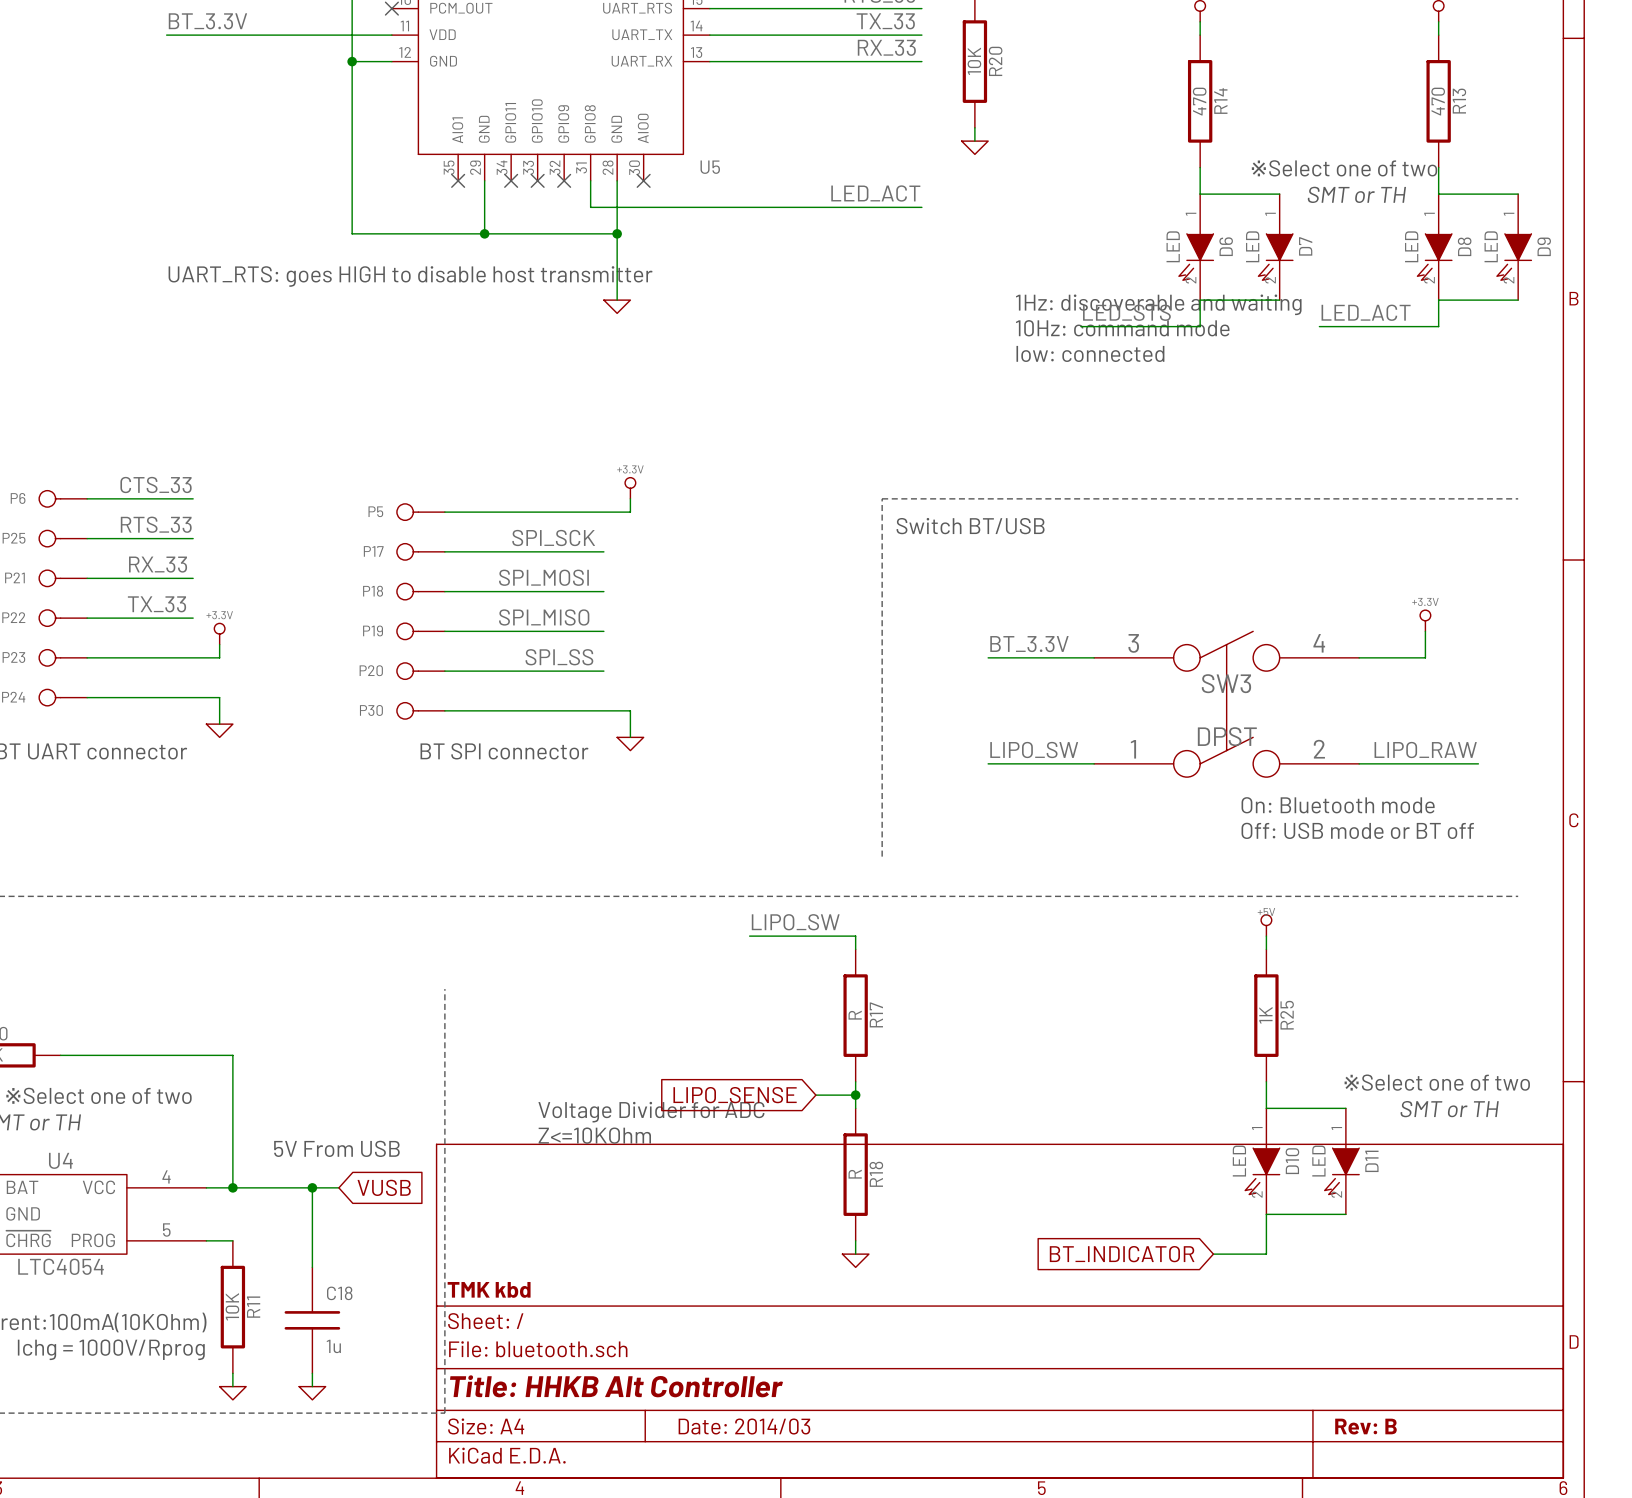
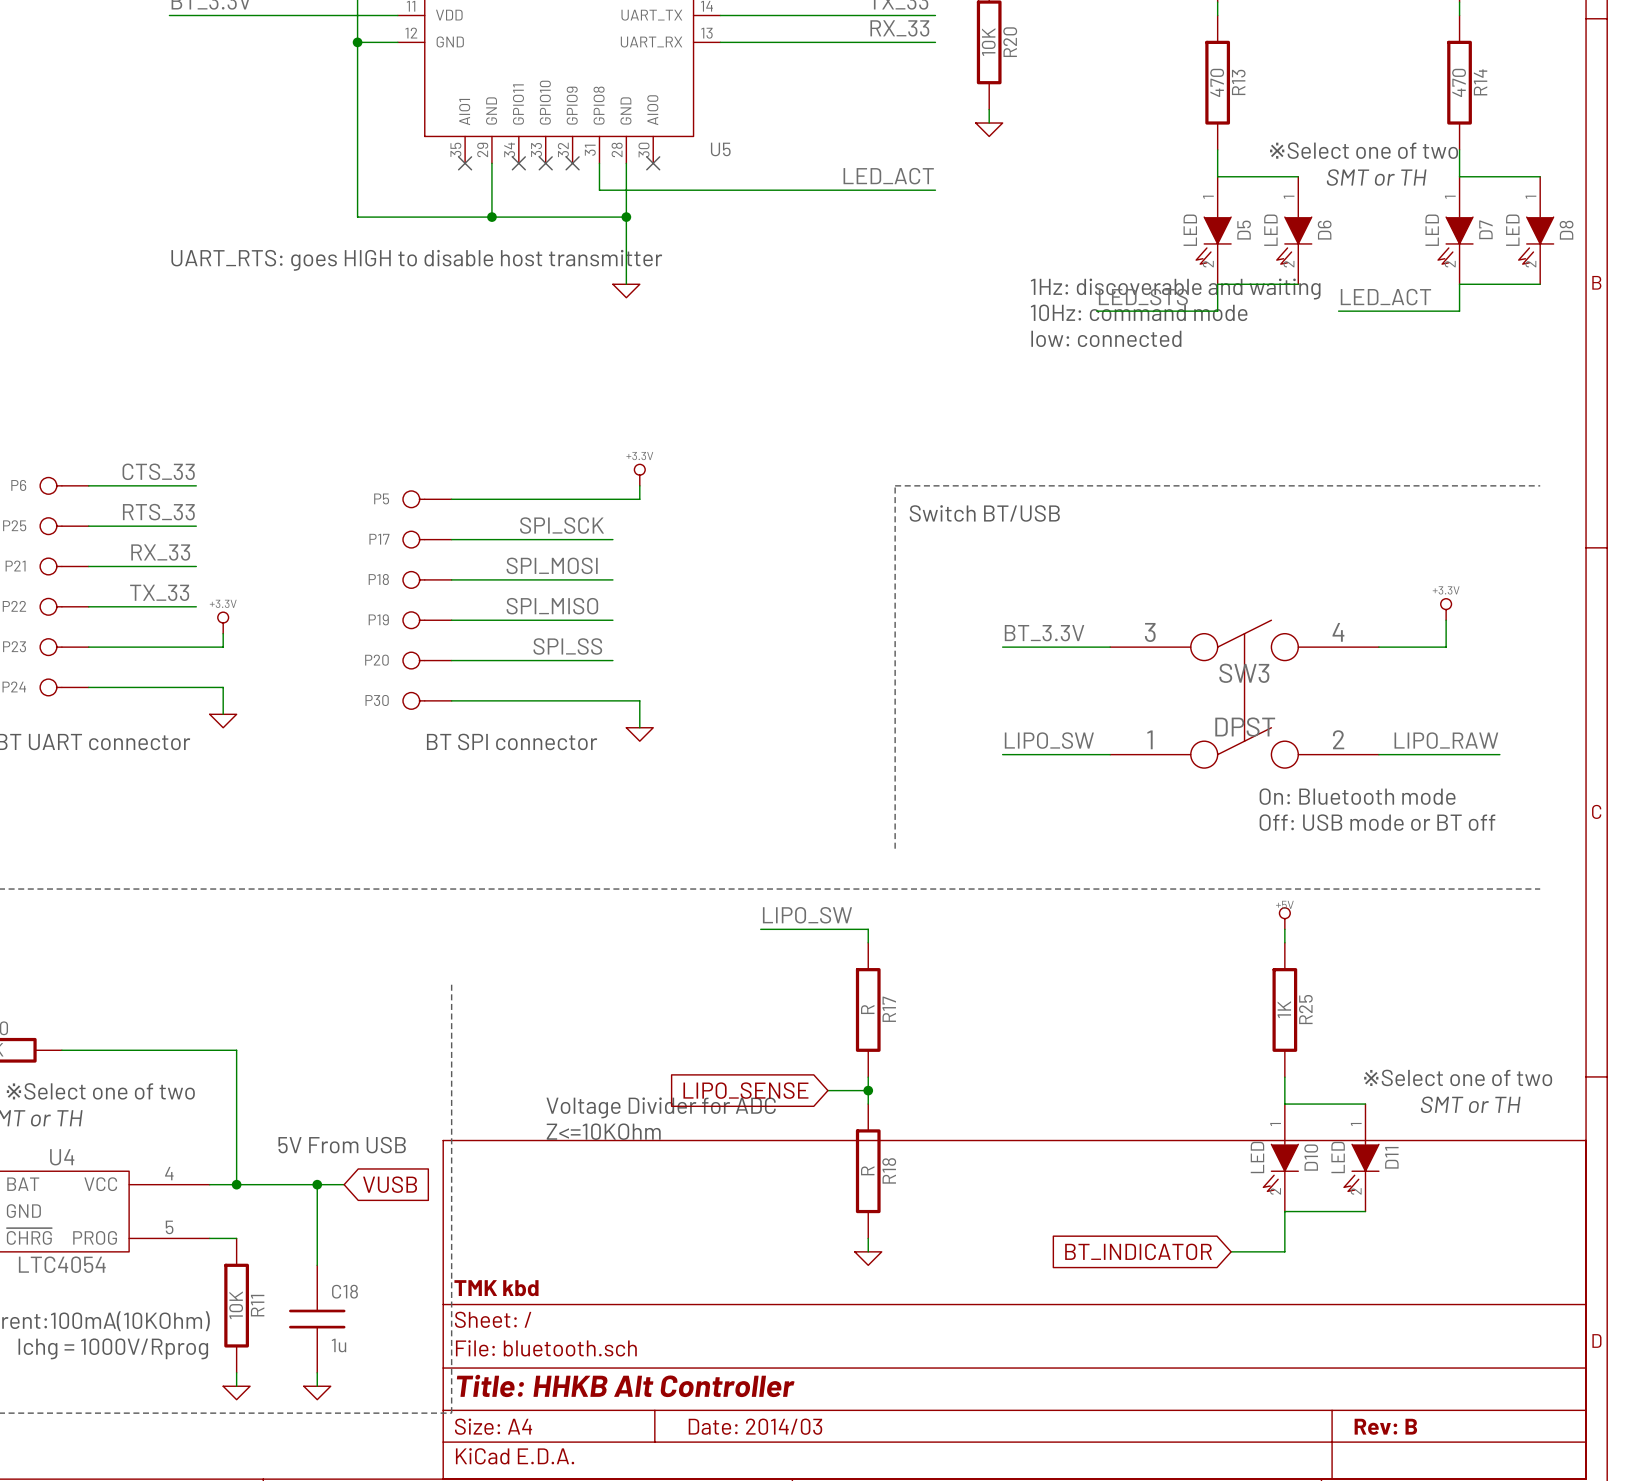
R14 name: R14 (1220, 101) -> R13 (1238, 82)
R13 name: R13 (1459, 101) -> R14 (1480, 82)
D6 name: D6 (1226, 246) -> D5 (1244, 230)
D7 name: D7 (1305, 246) -> D6 (1324, 230)
D8 name: D8 (1464, 246) -> D7 (1485, 229)
D9 name: D9 (1544, 246) -> D8 (1566, 230)

